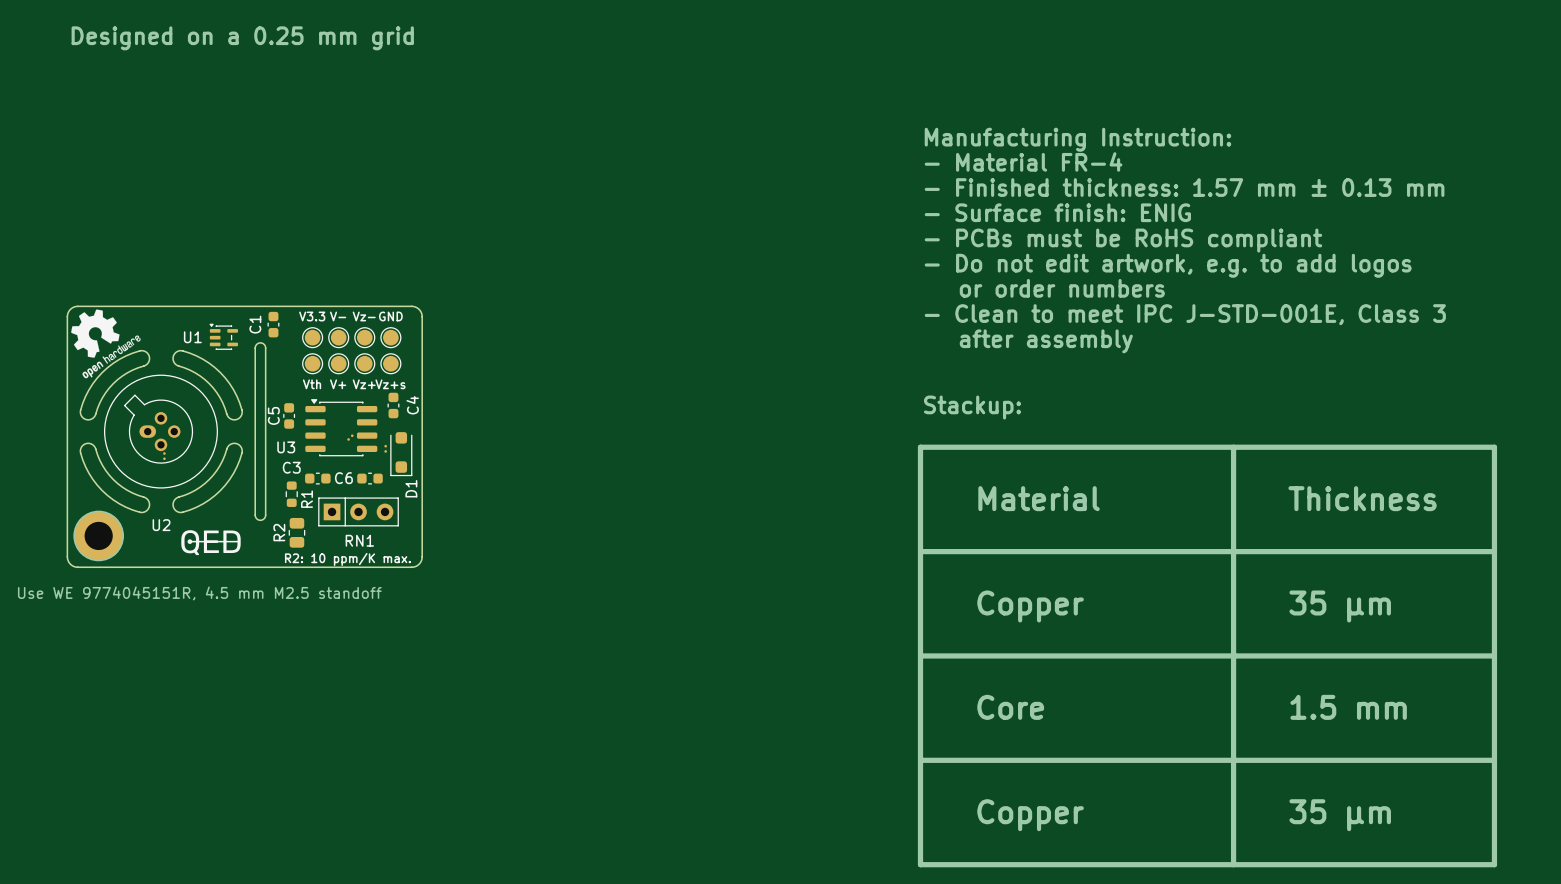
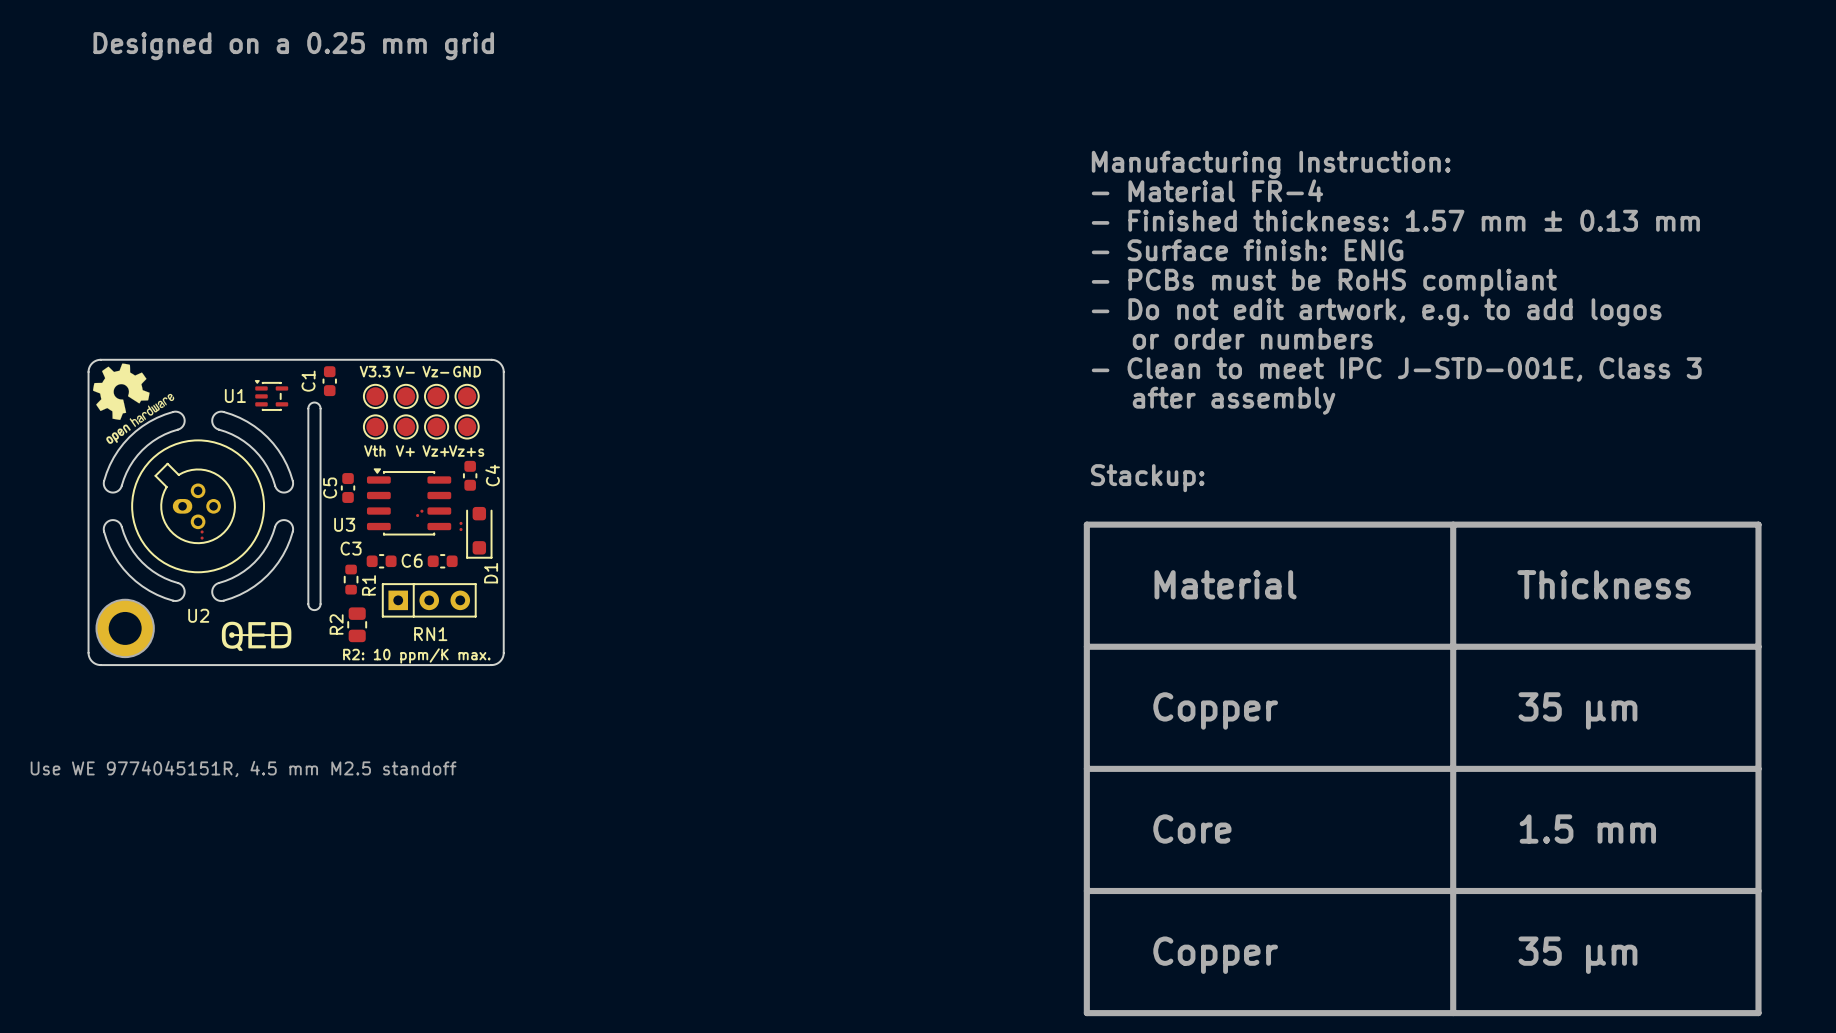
text position: Use WE 9774045151R, 4.5 mm M2.5 standoff (199, 593) -> Use WE 9774045151R, 4.5 mm M2.5 standoff (243, 769)

